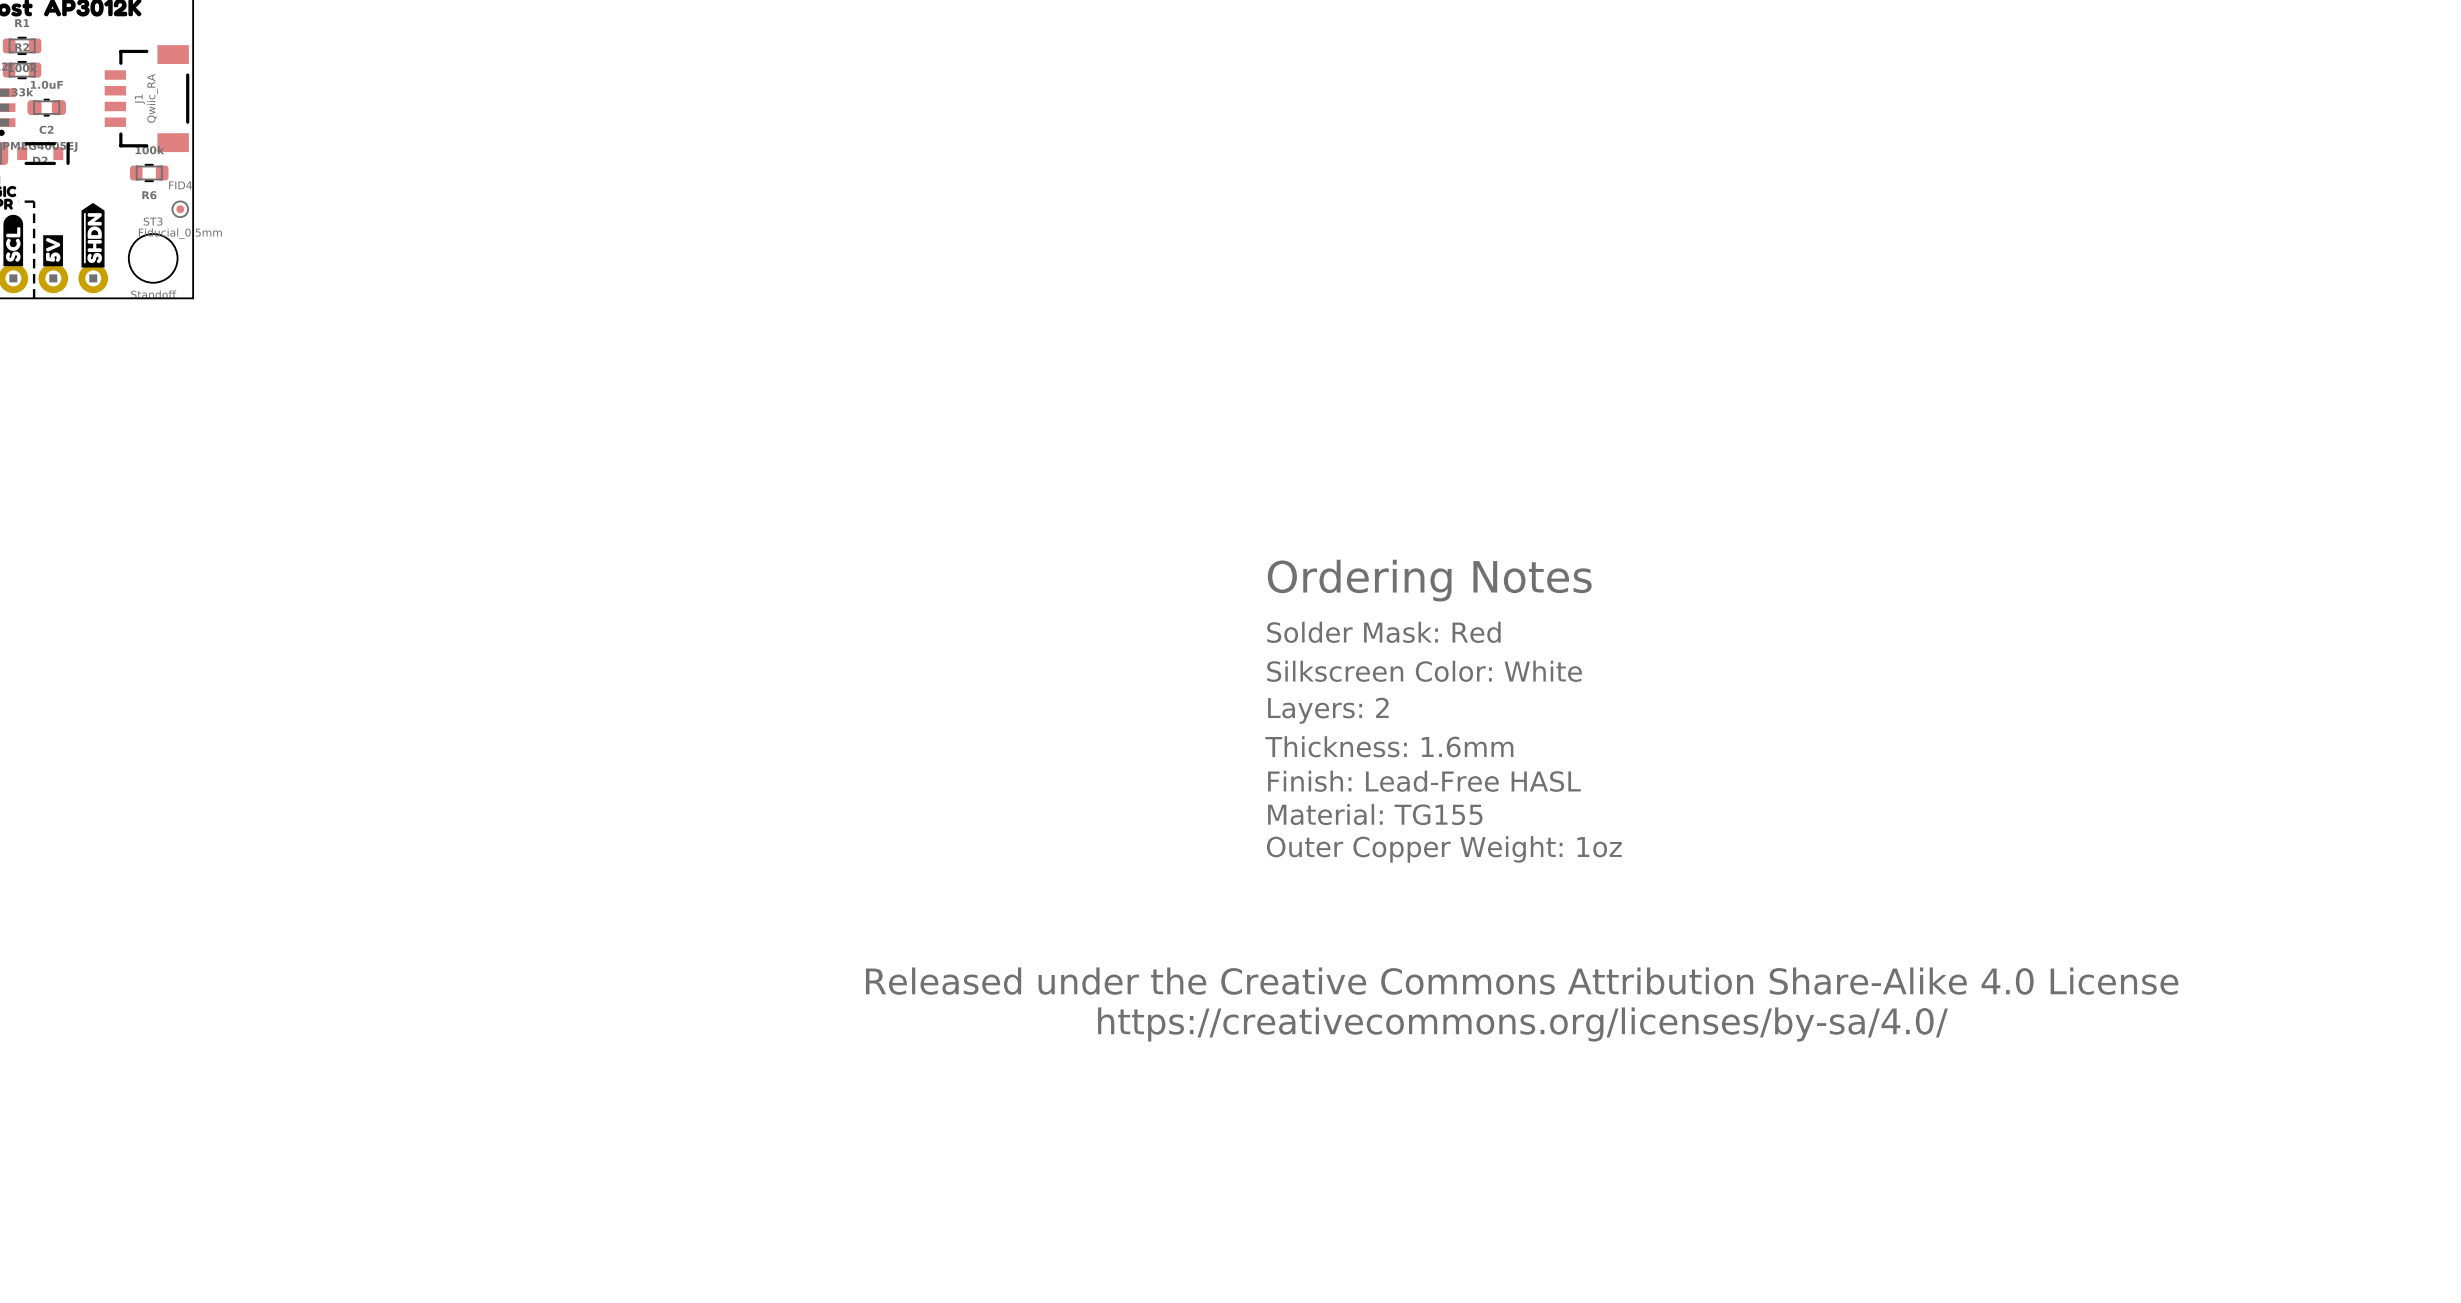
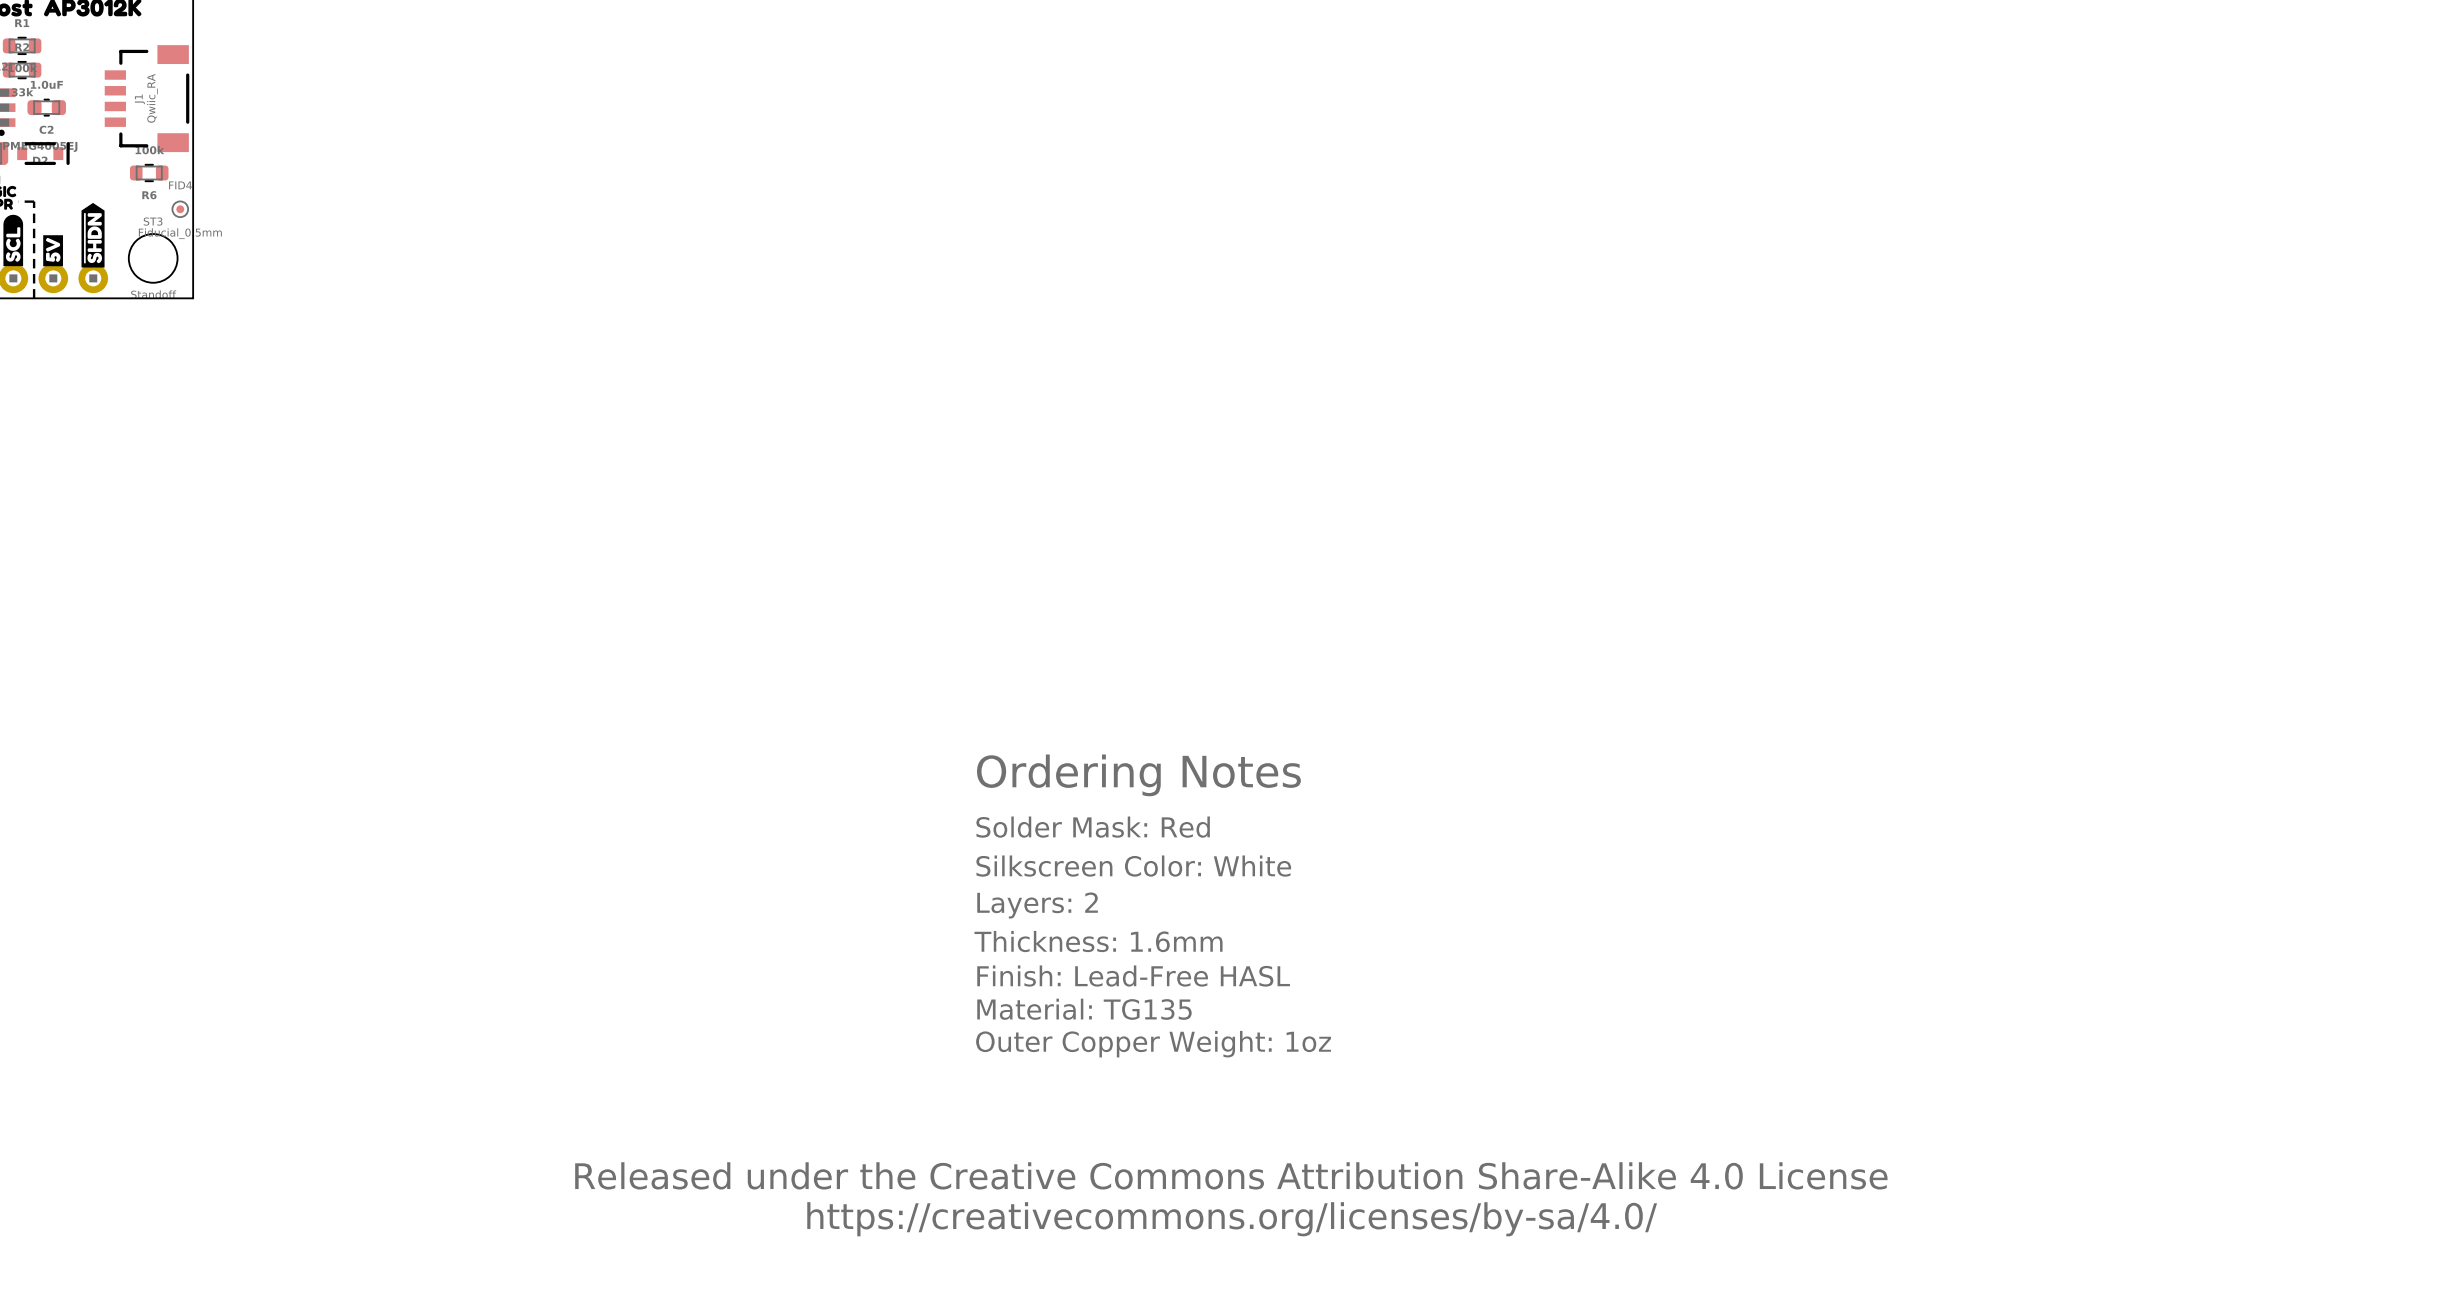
text position: Ordering Notes (1429, 580) -> Ordering Notes (1138, 775)
text position: Solder Mask: Red (1383, 632) -> Solder Mask: Red (1093, 827)
text position: Silkscreen Color: White (1424, 671) -> Silkscreen Color: White (1133, 866)
text position: Layers: 2 (1328, 710) -> Layers: 2 (1037, 905)
text position: Thickness: 1.6mm (1389, 746) -> Thickness: 1.6mm (1098, 941)
text position: Finish: Lead-Free HASL (1424, 781) -> Finish: Lead-Free HASL (1133, 976)
text: Material: TG155 (1375, 814) -> none
text position: Outer Copper Weight: 1oz (1444, 849) -> Outer Copper Weight: 1oz (1153, 1044)
drawing position: (1522, 1004) -> (1231, 1199)
text: none -> Material: TG135 (1084, 1009)

